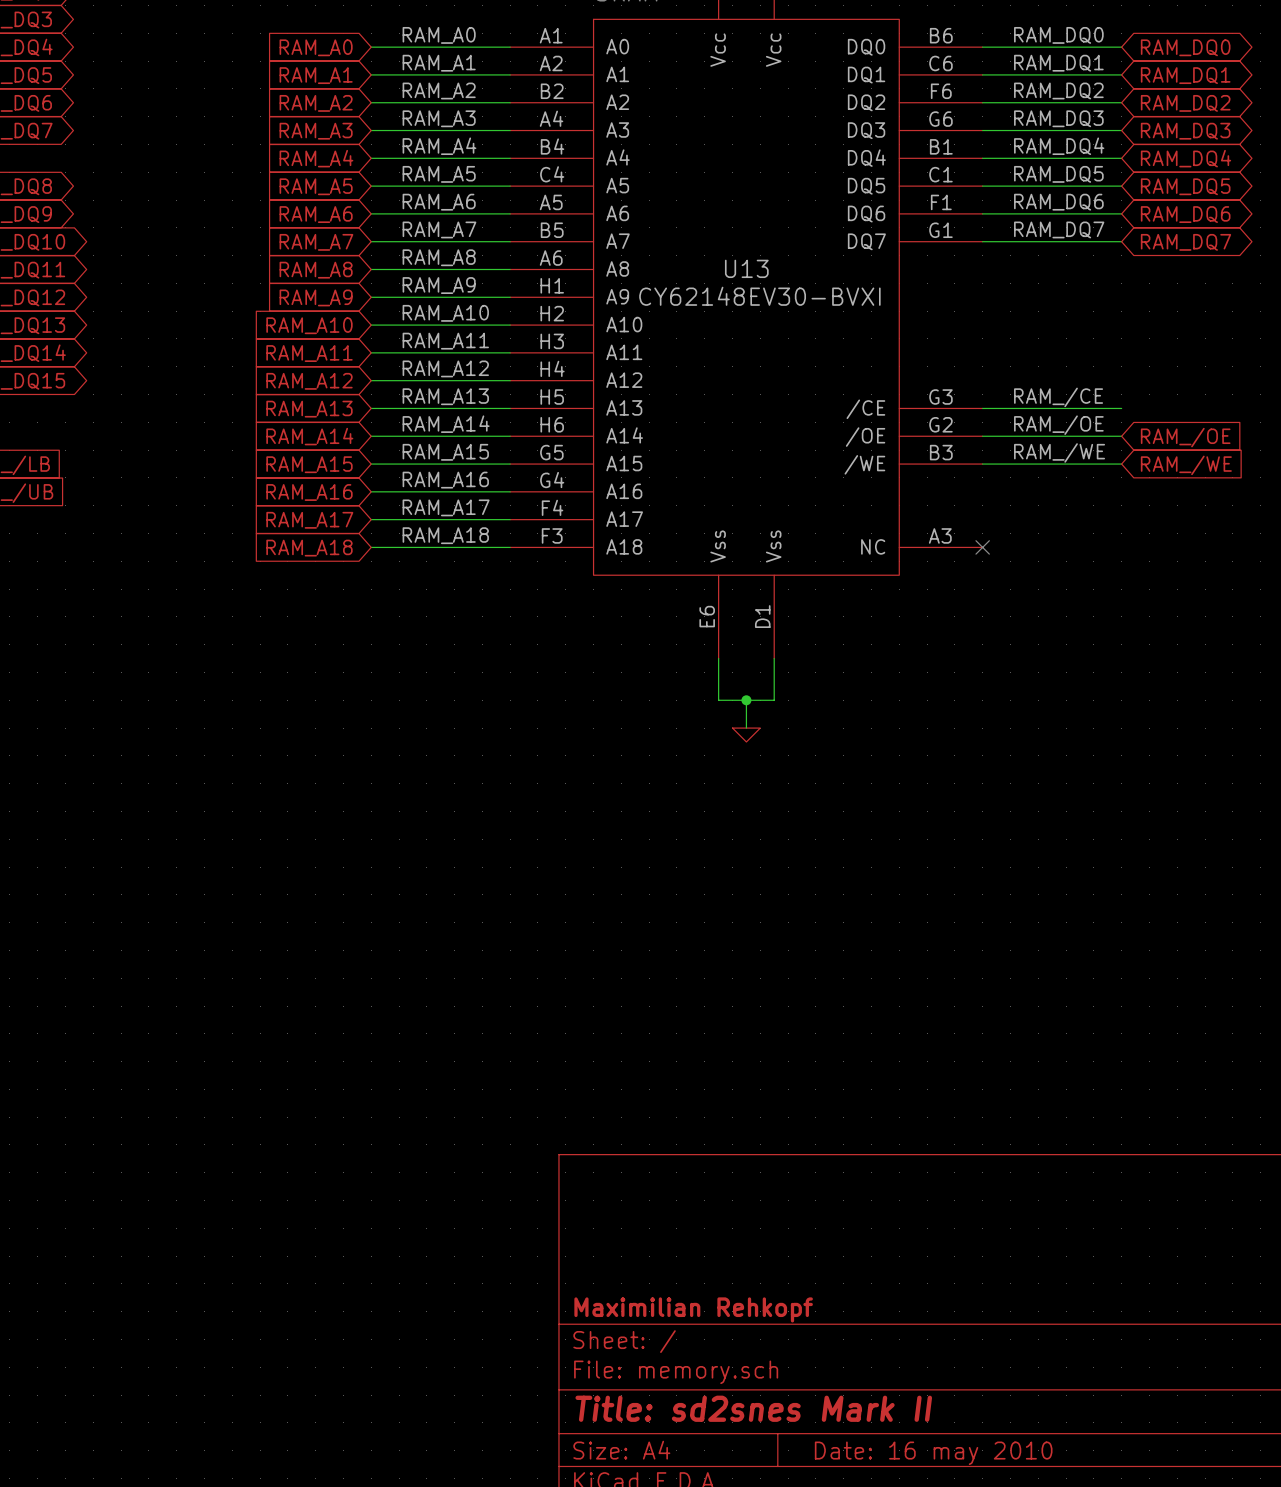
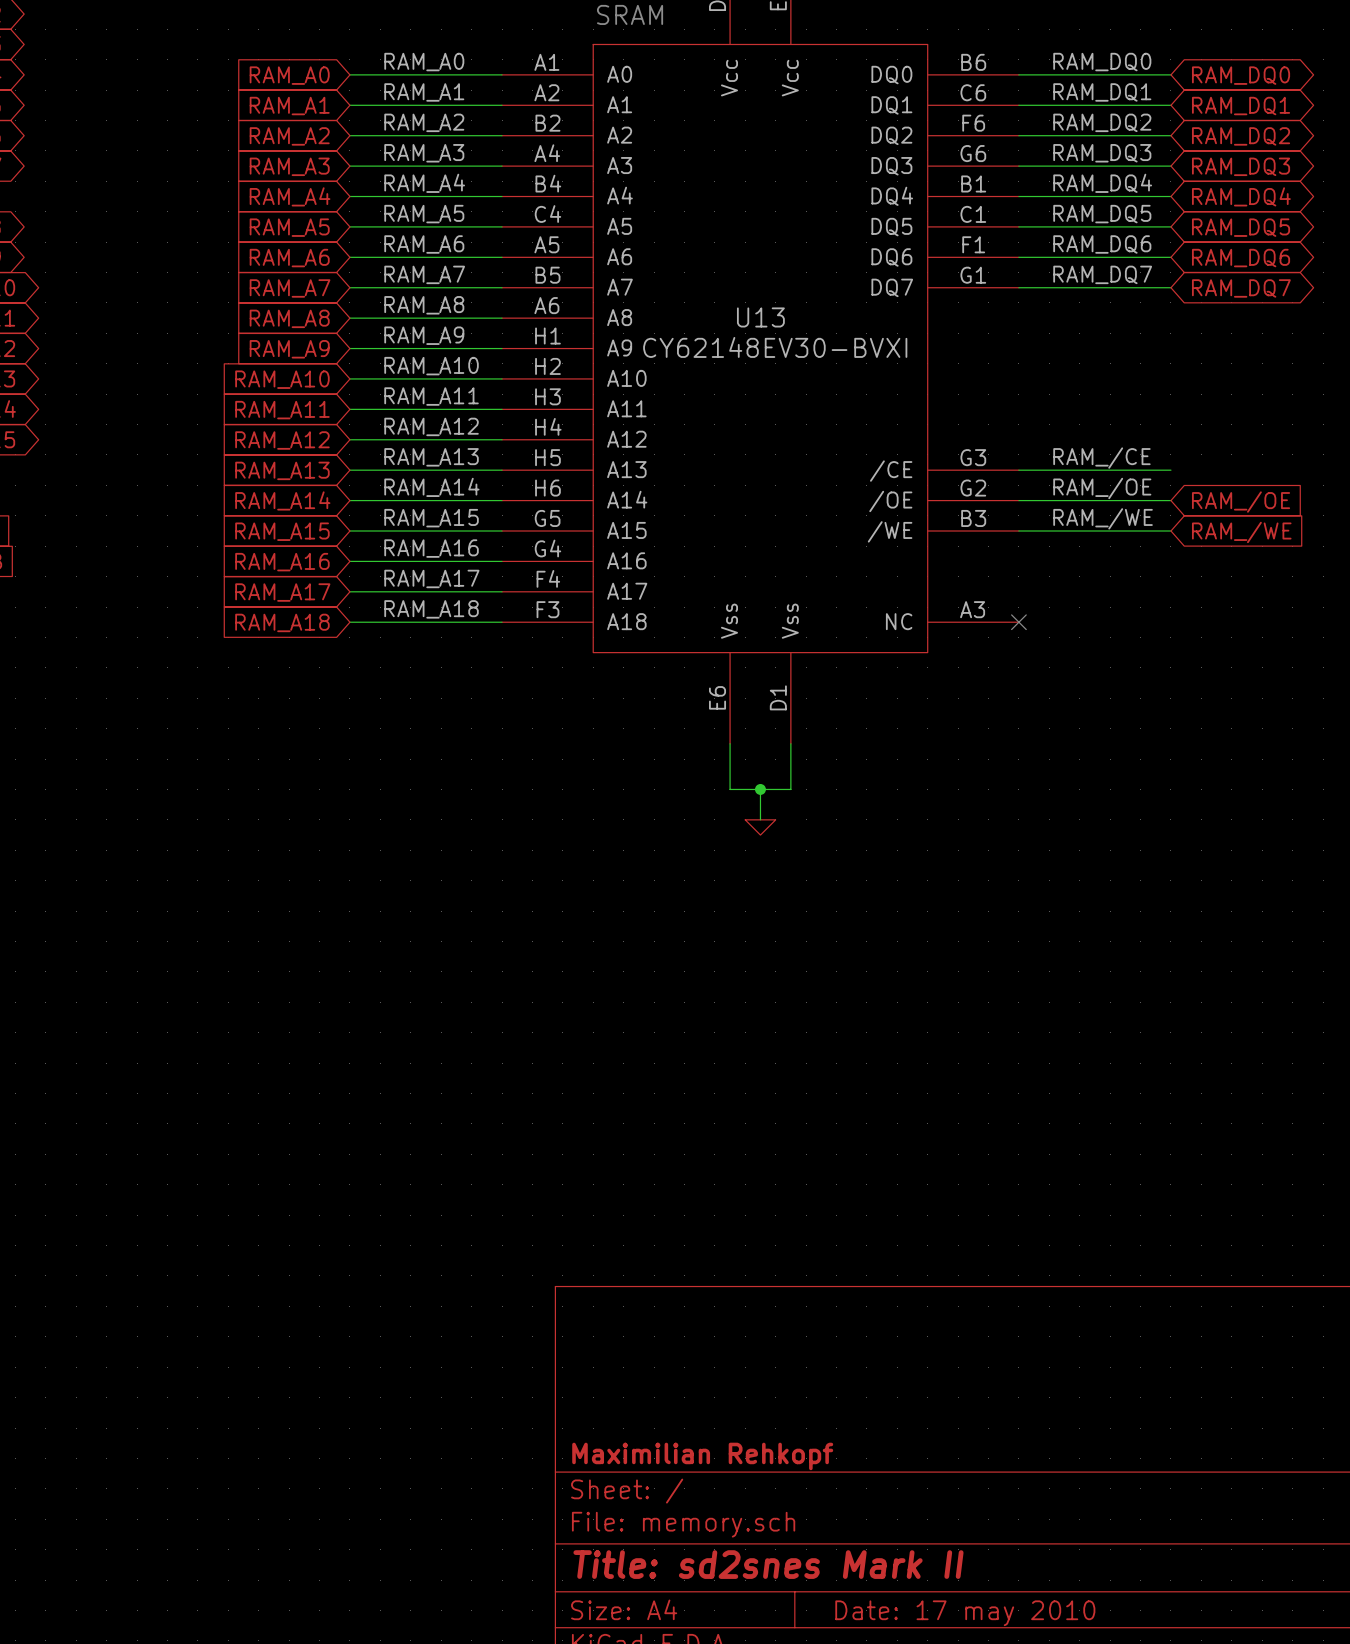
title block: Date: 16 may 2010 (933, 1453) -> Date: 17 may 2010 (965, 1613)

